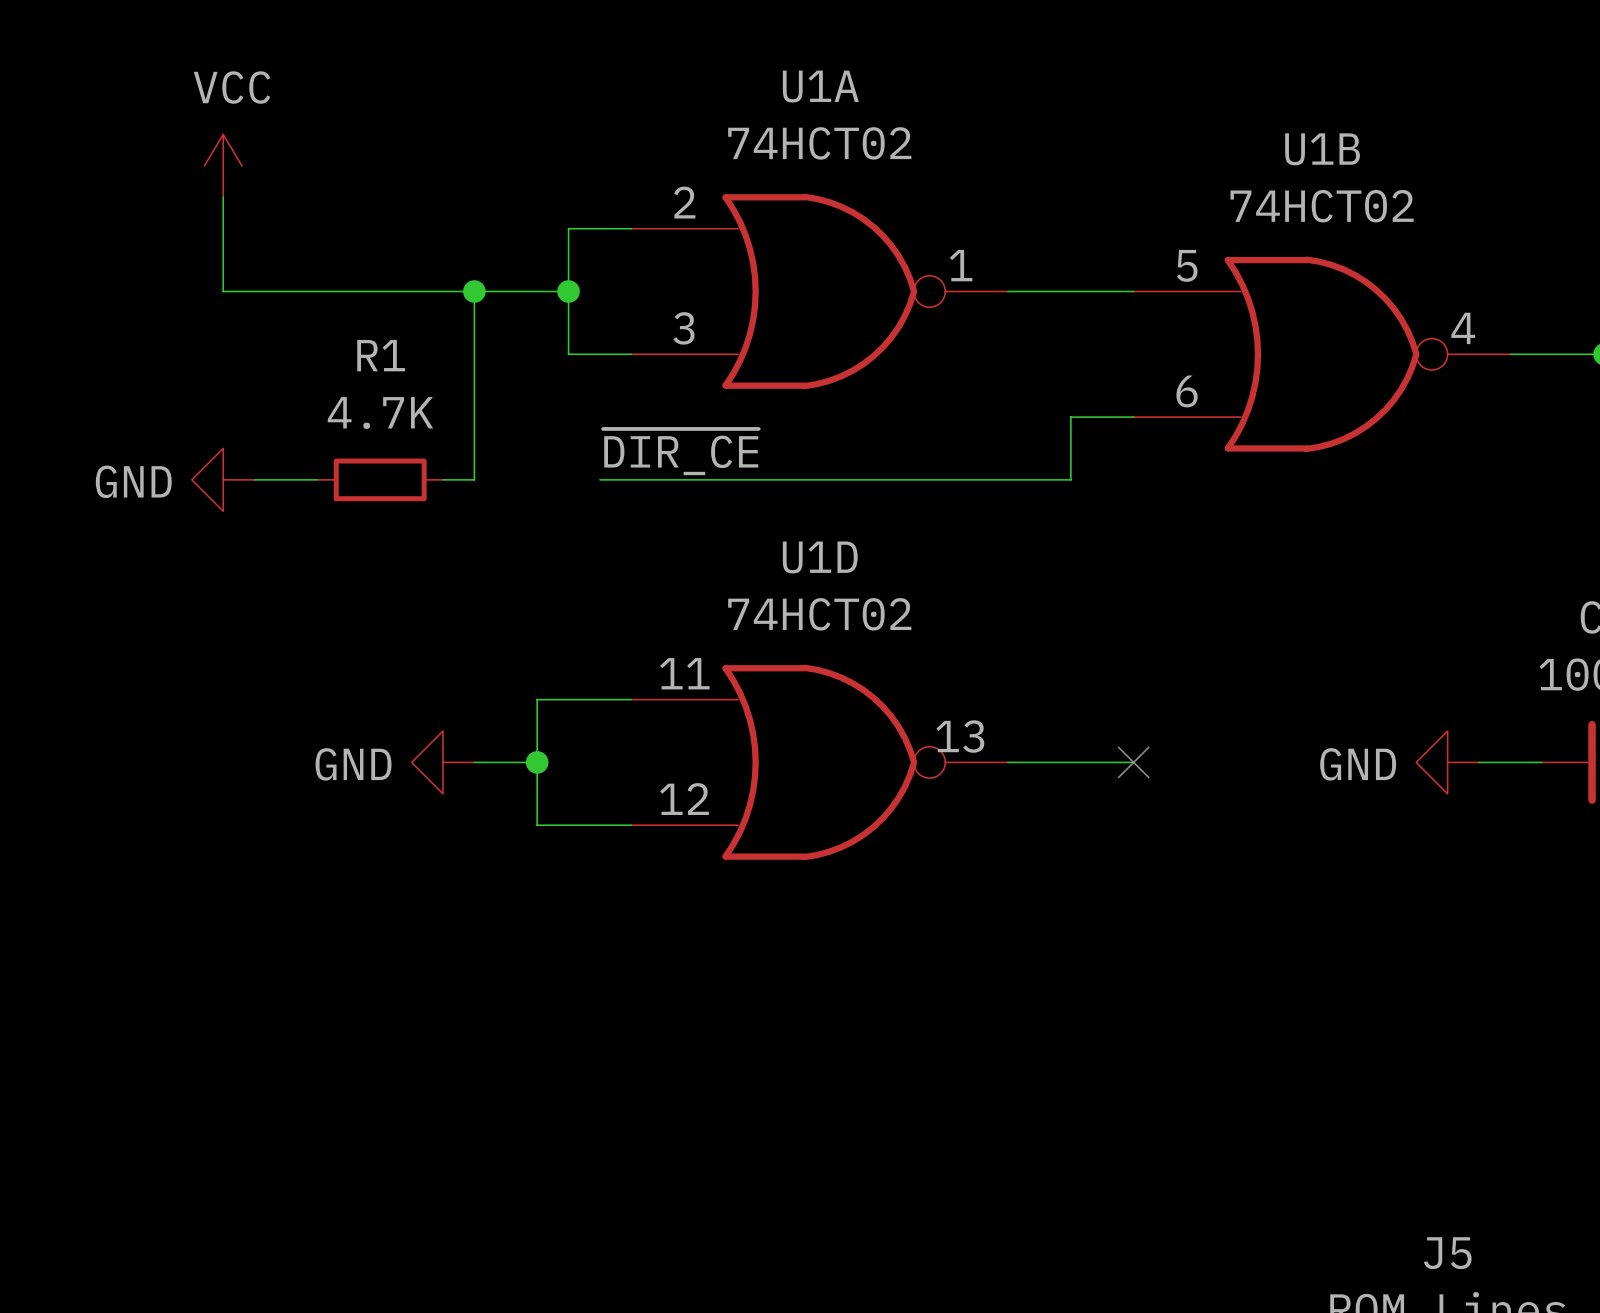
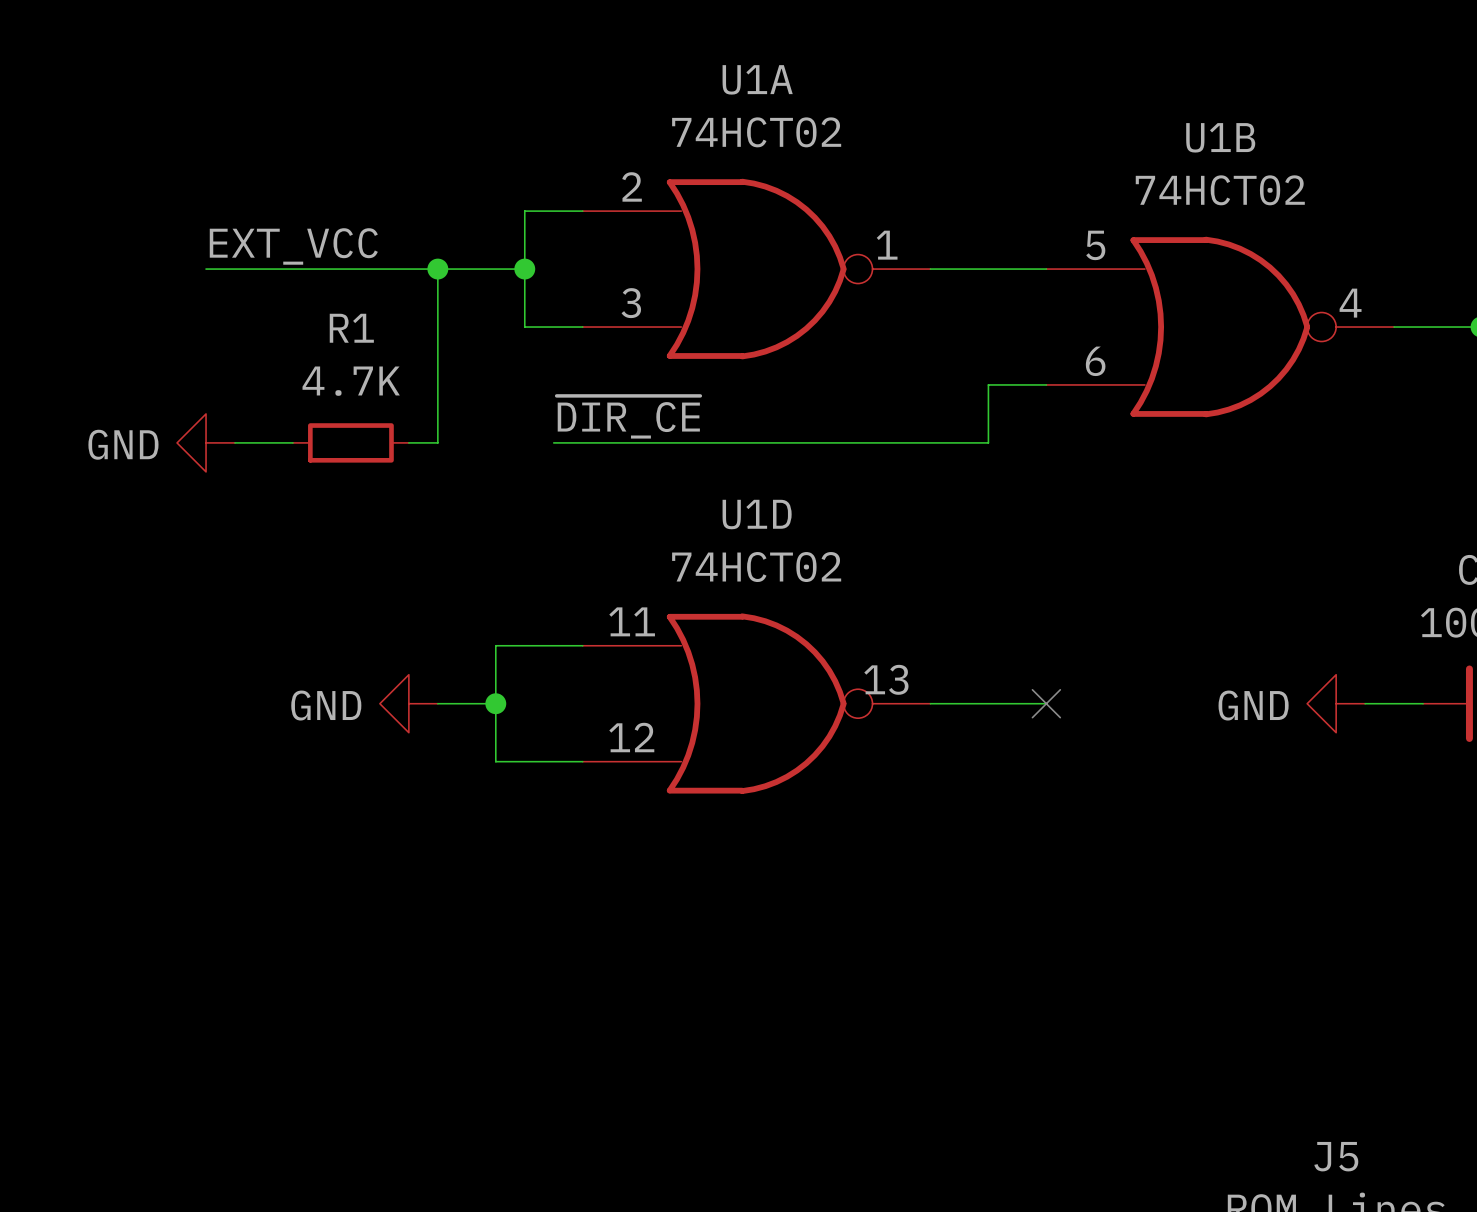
power symbol: VCC (223, 165) -> none
wire: (223, 197) (223, 291) -> none
label: none -> EXT_VCC (293, 246)

